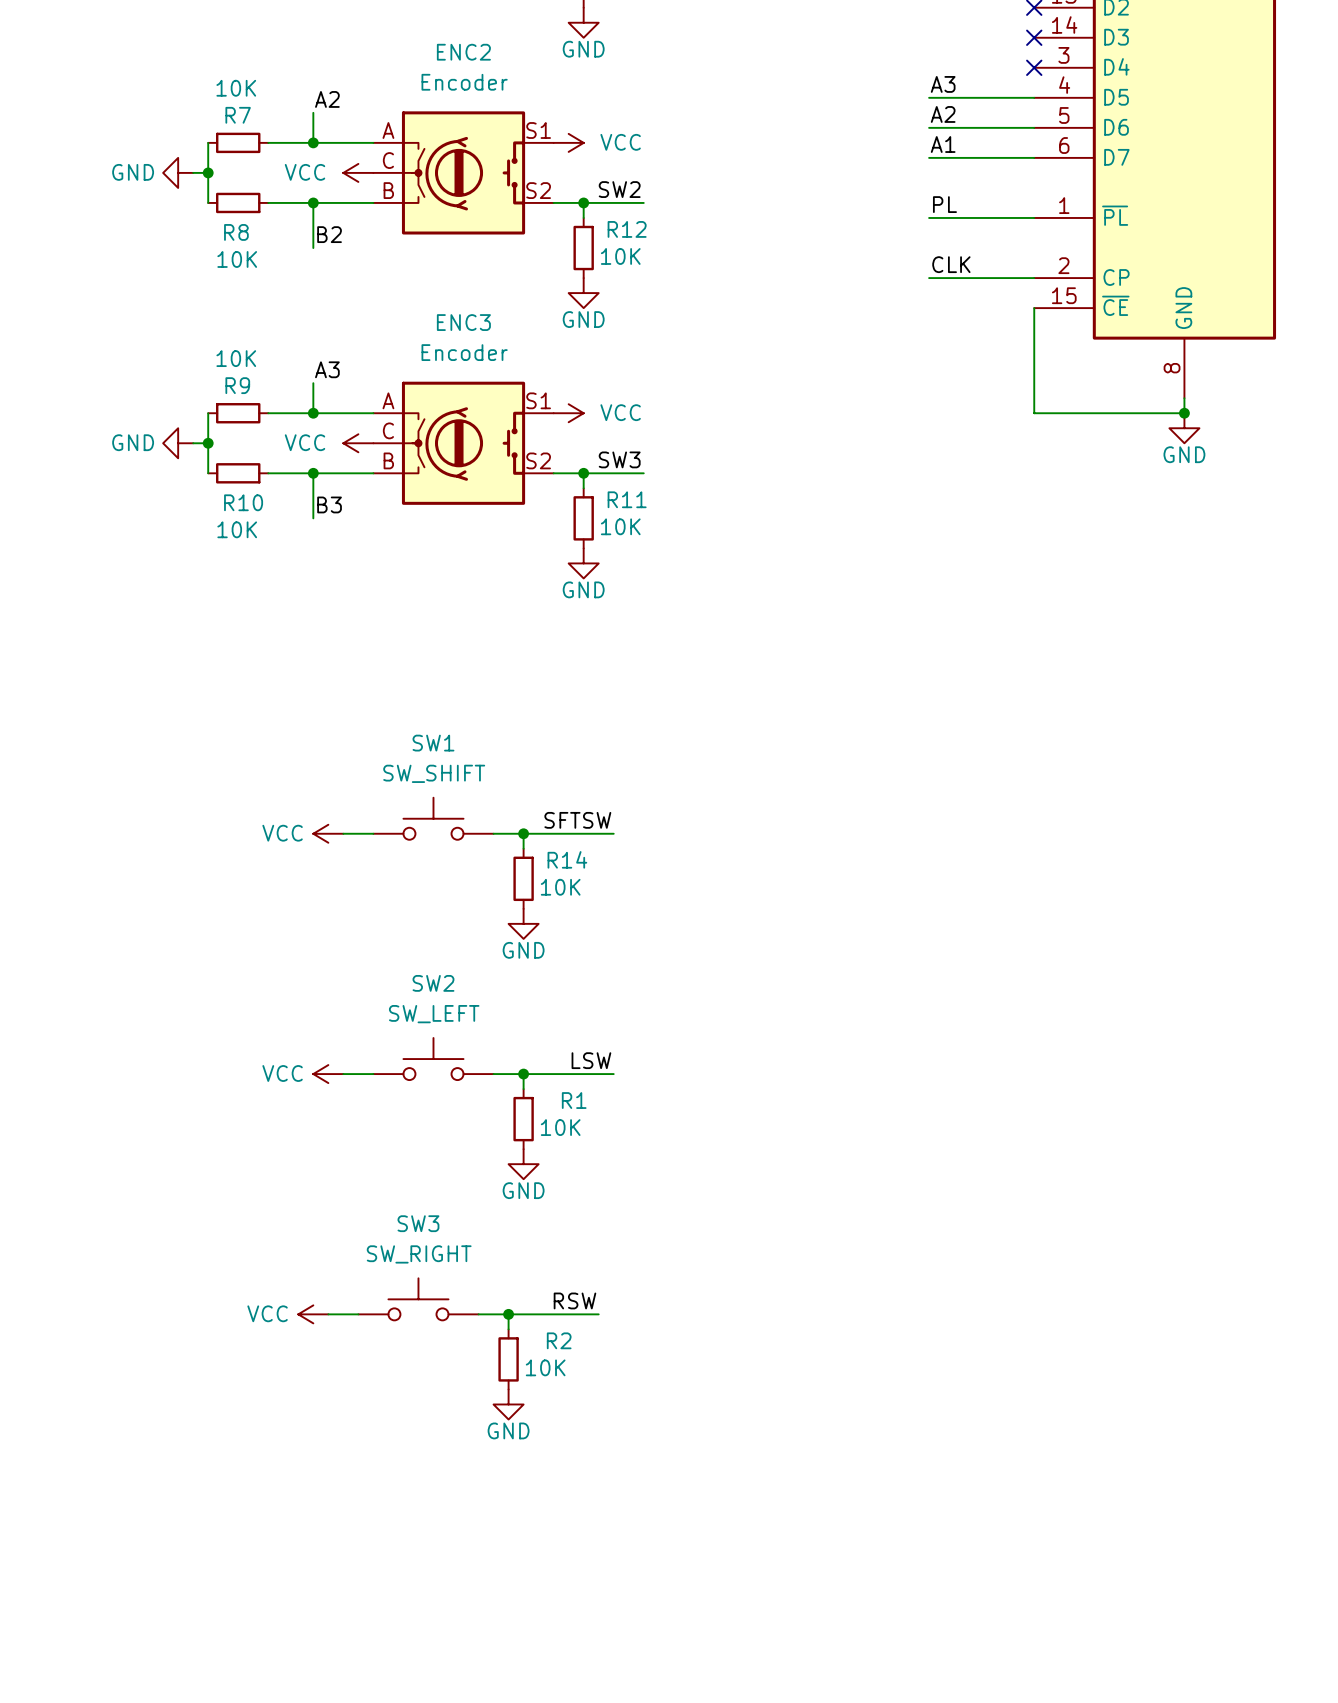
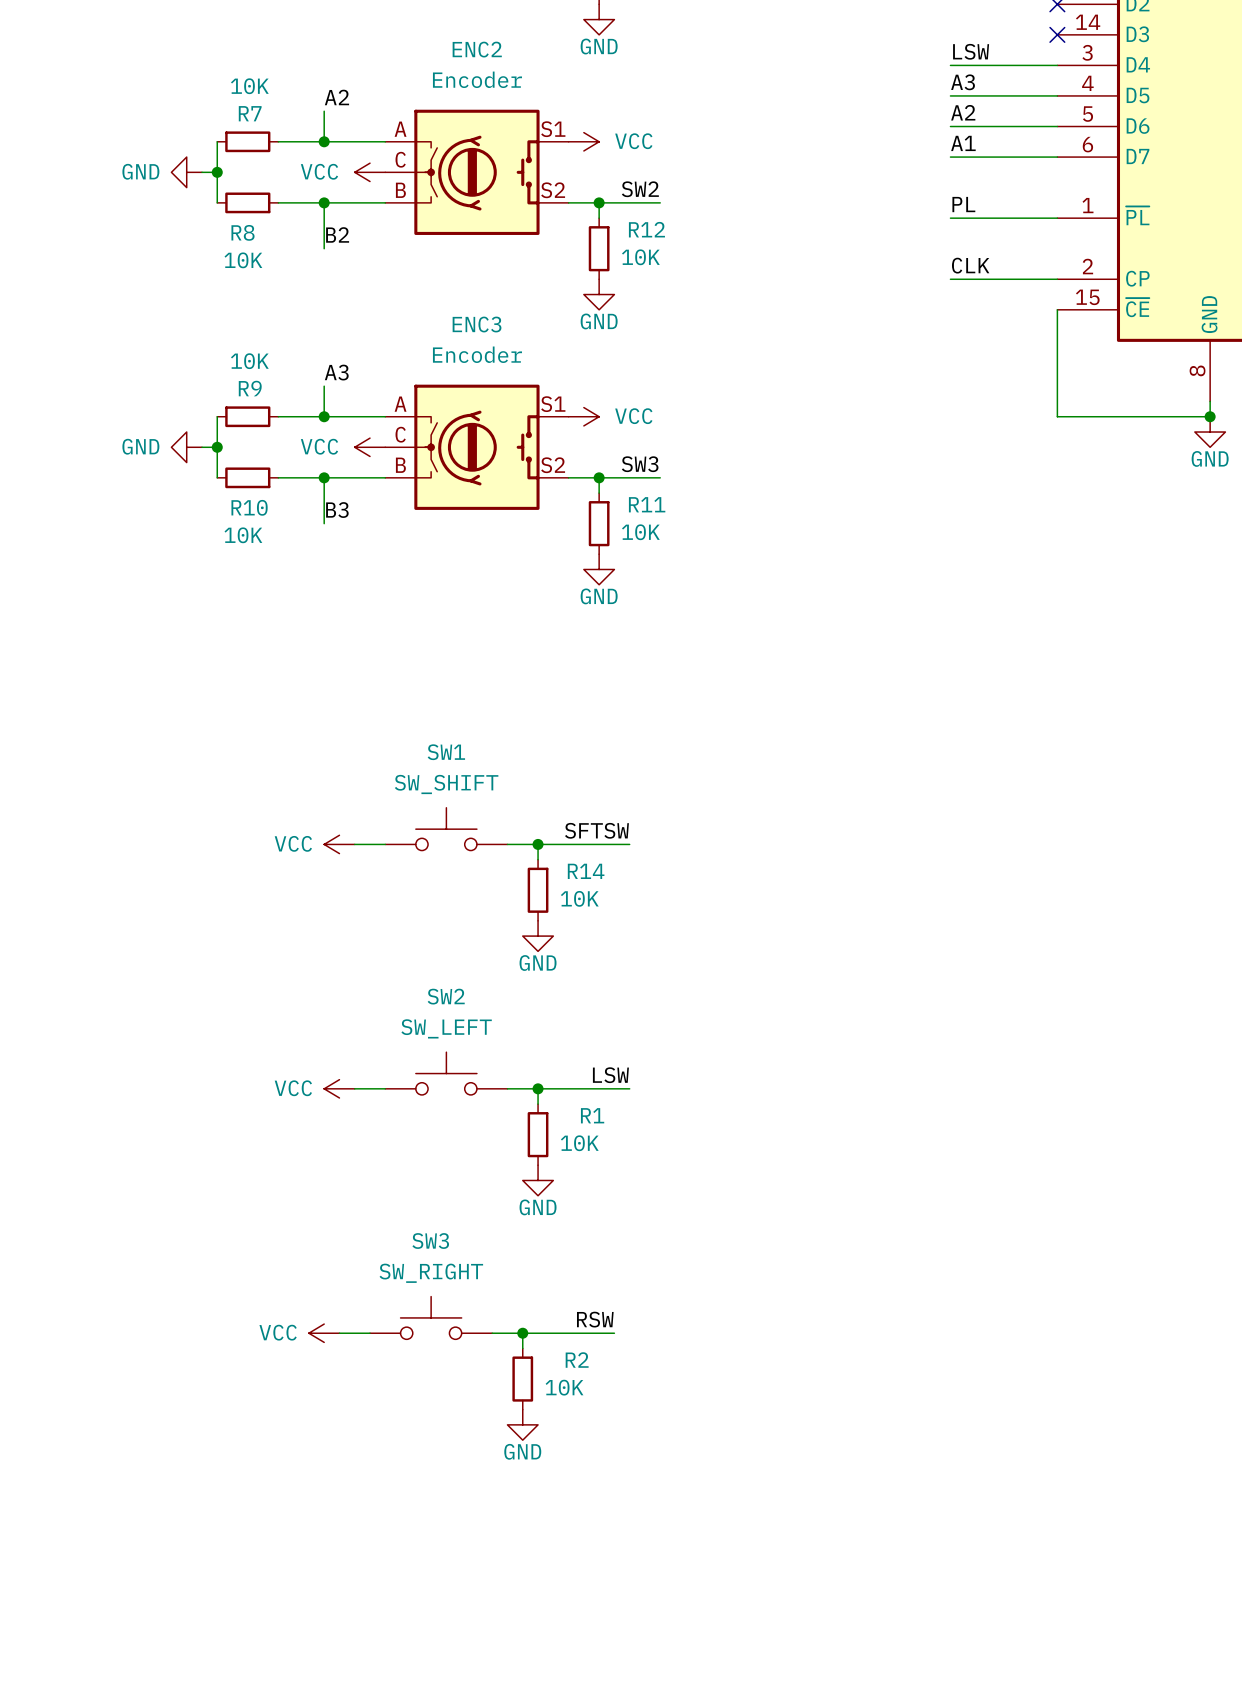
label: none -> LSW (971, 51)
wire: none -> (950, 65) (1057, 65)
no-connect mark: (1034, 67) -> none

